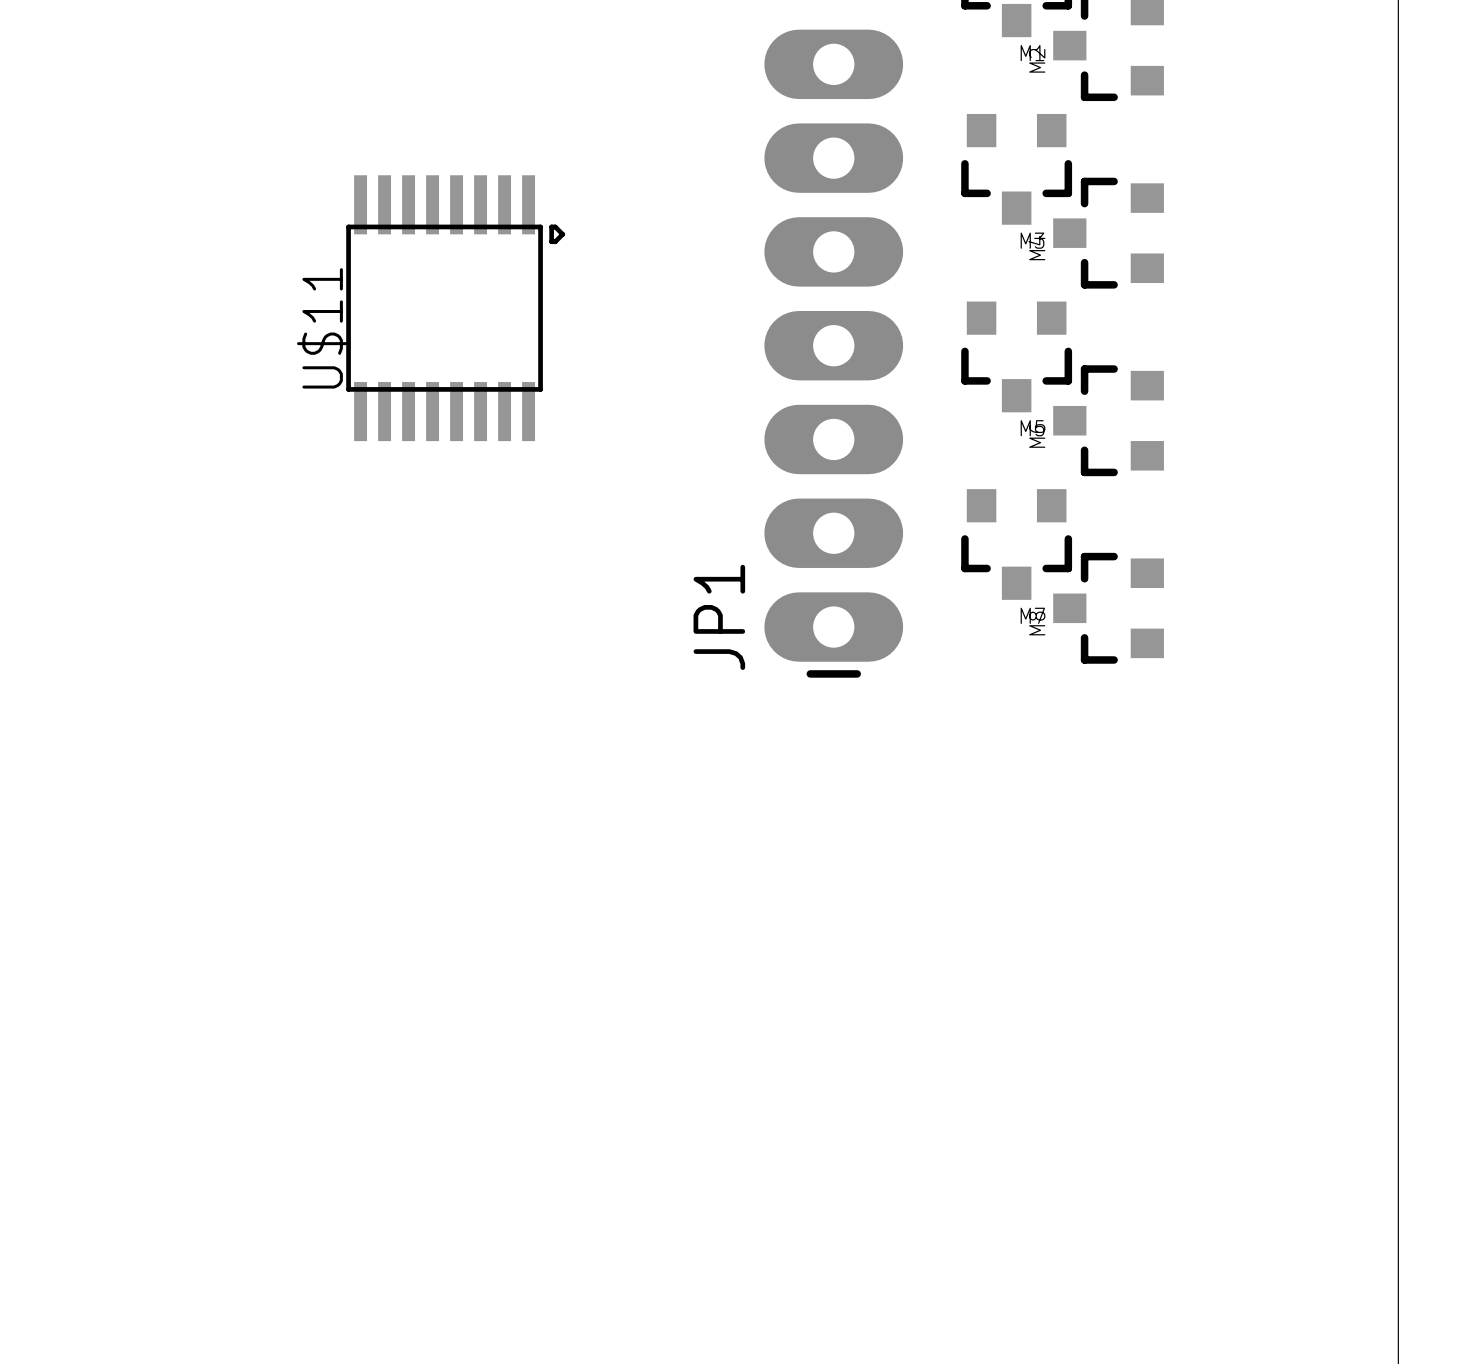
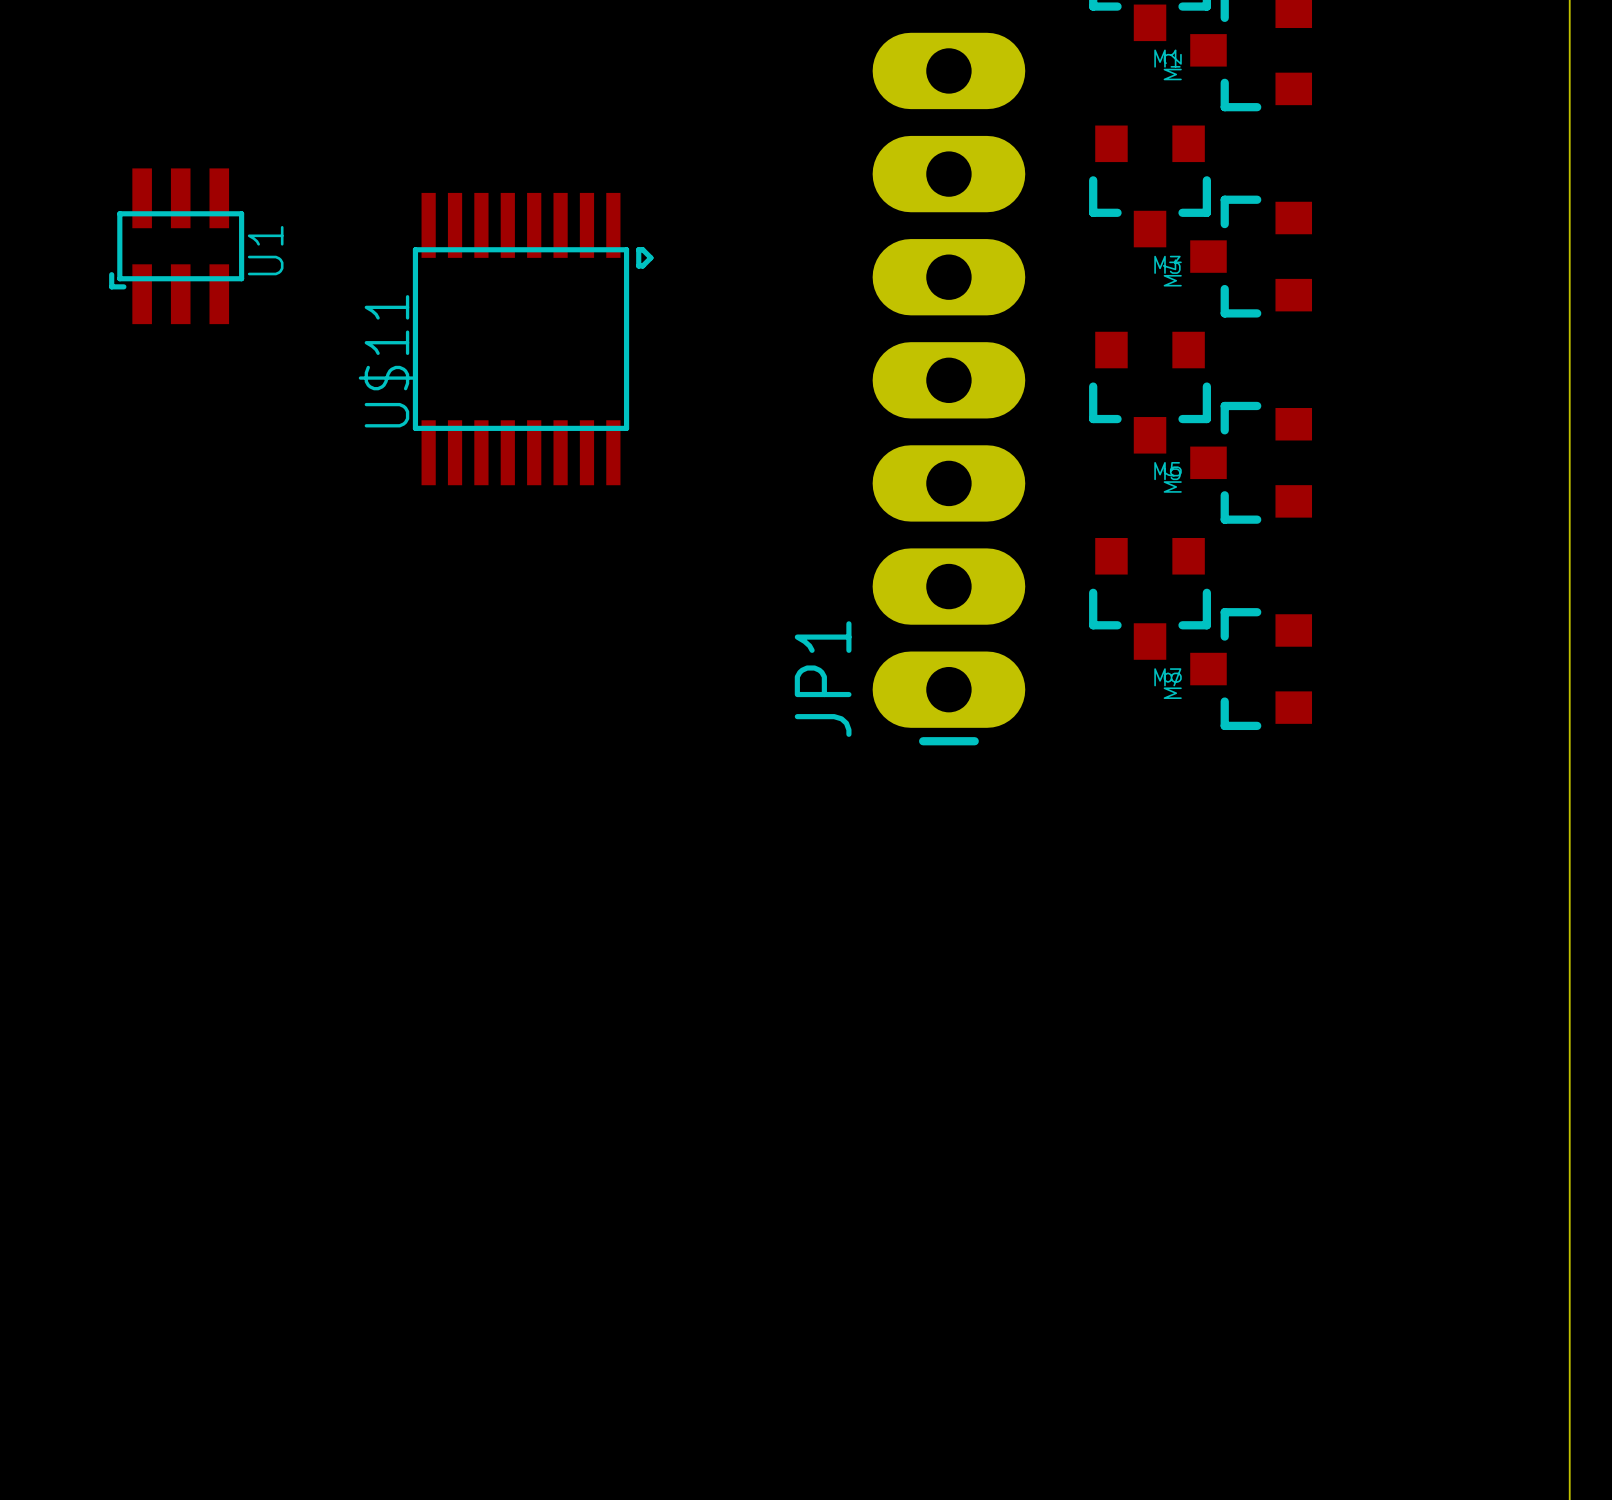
U1: none -> (176, 246)

